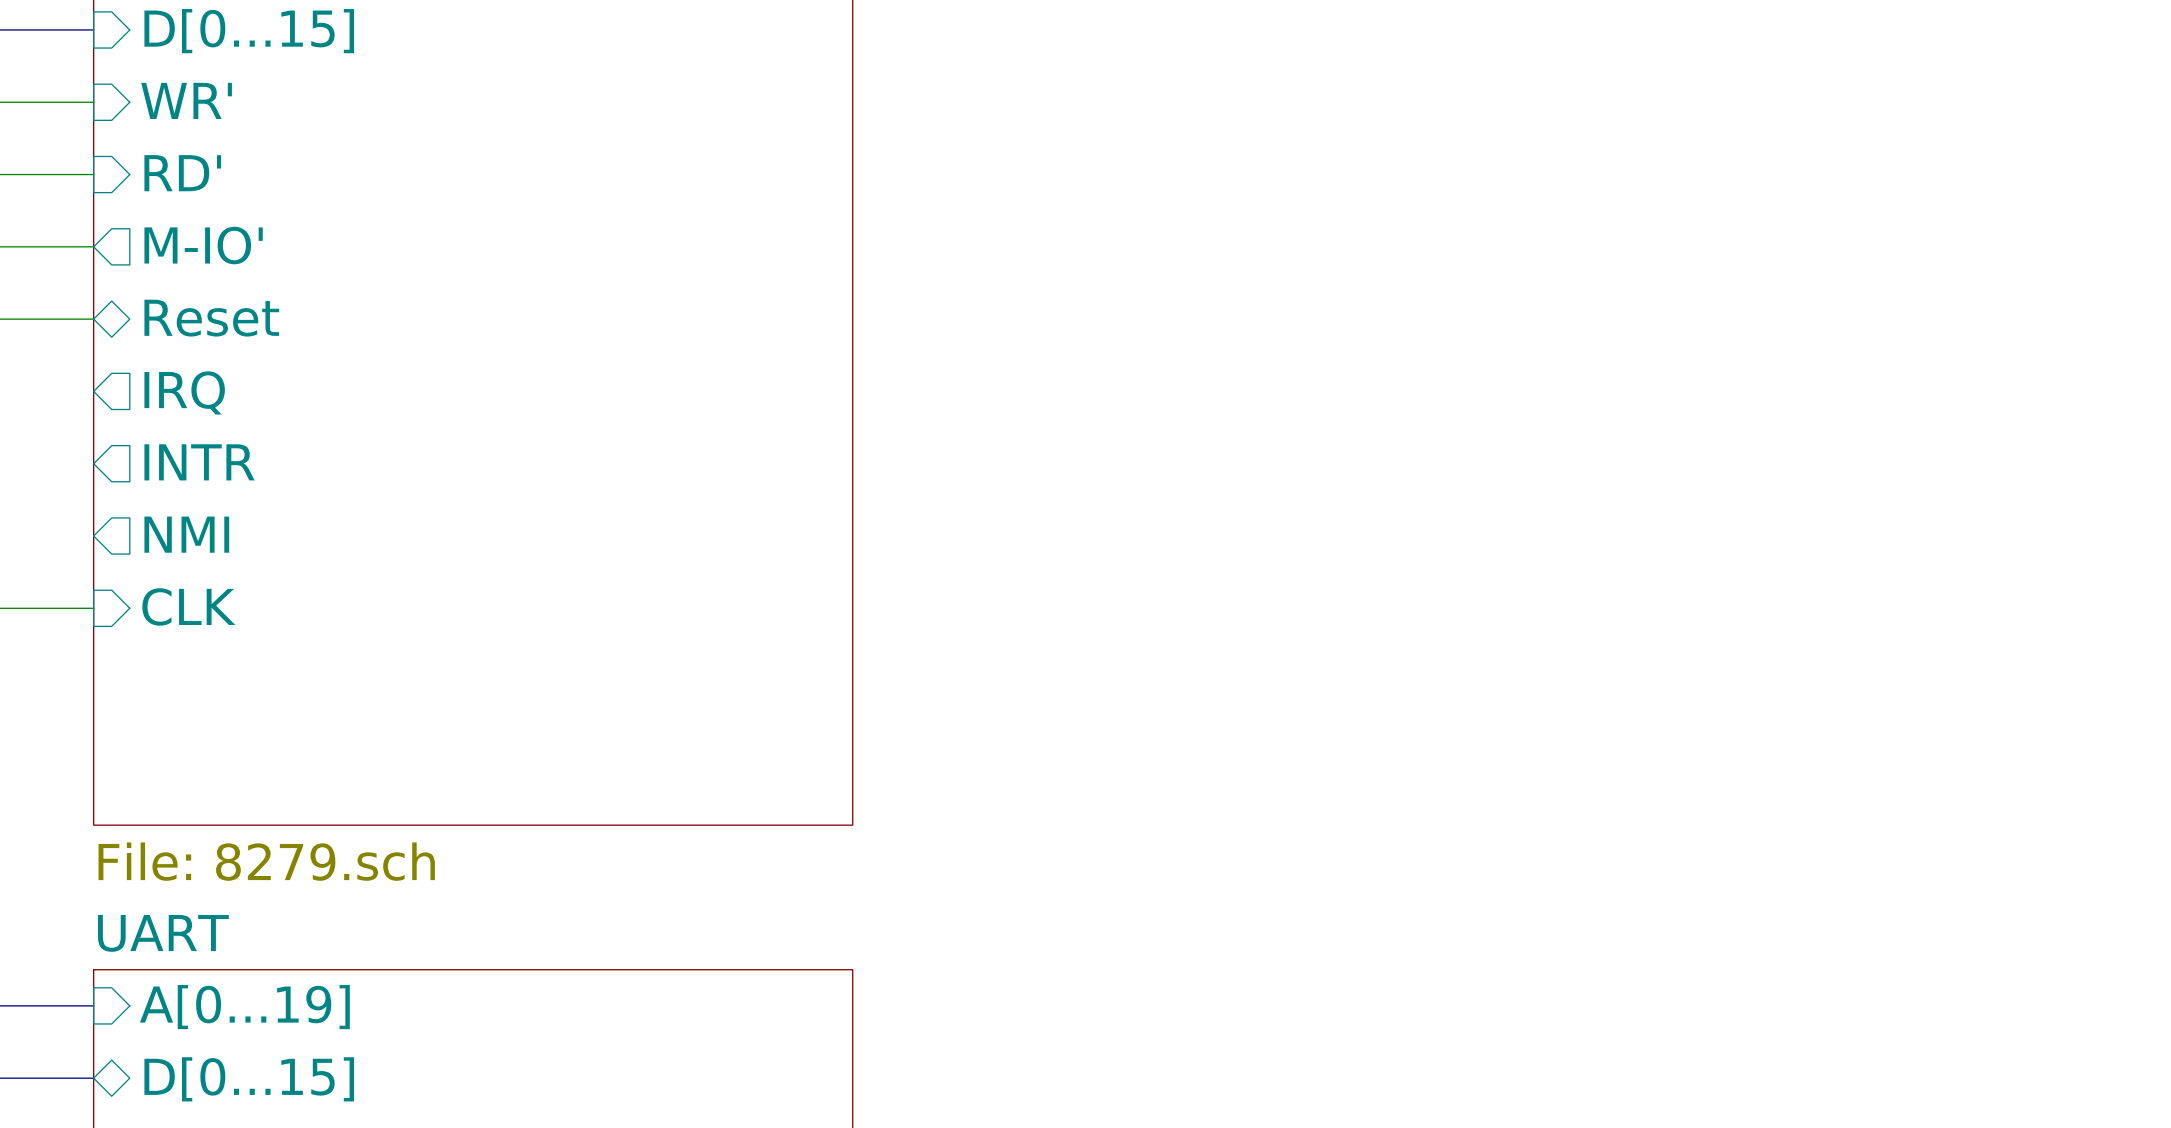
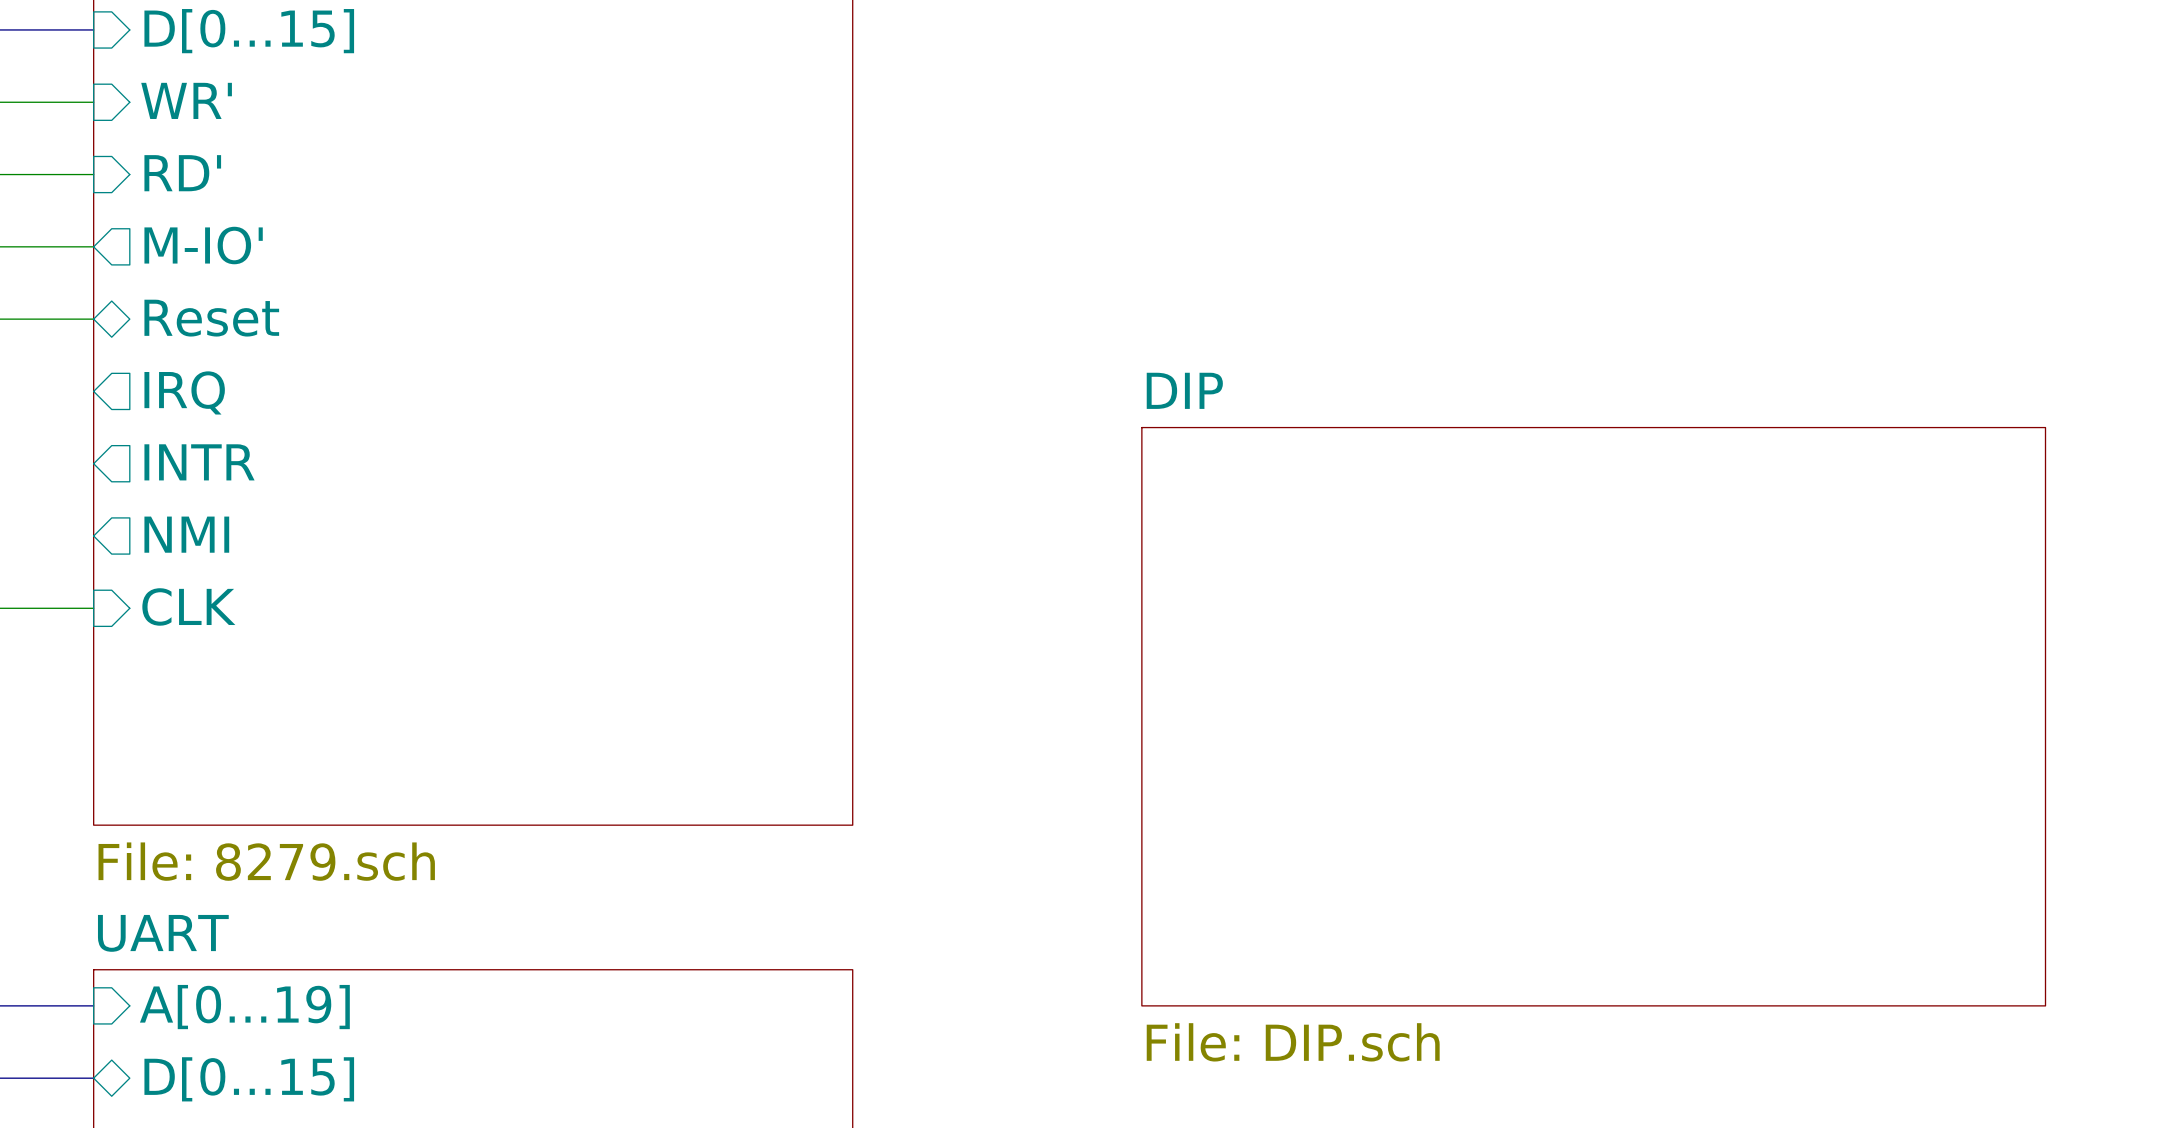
sheet DIP: none -> File: DIP.sch (1593, 716)

